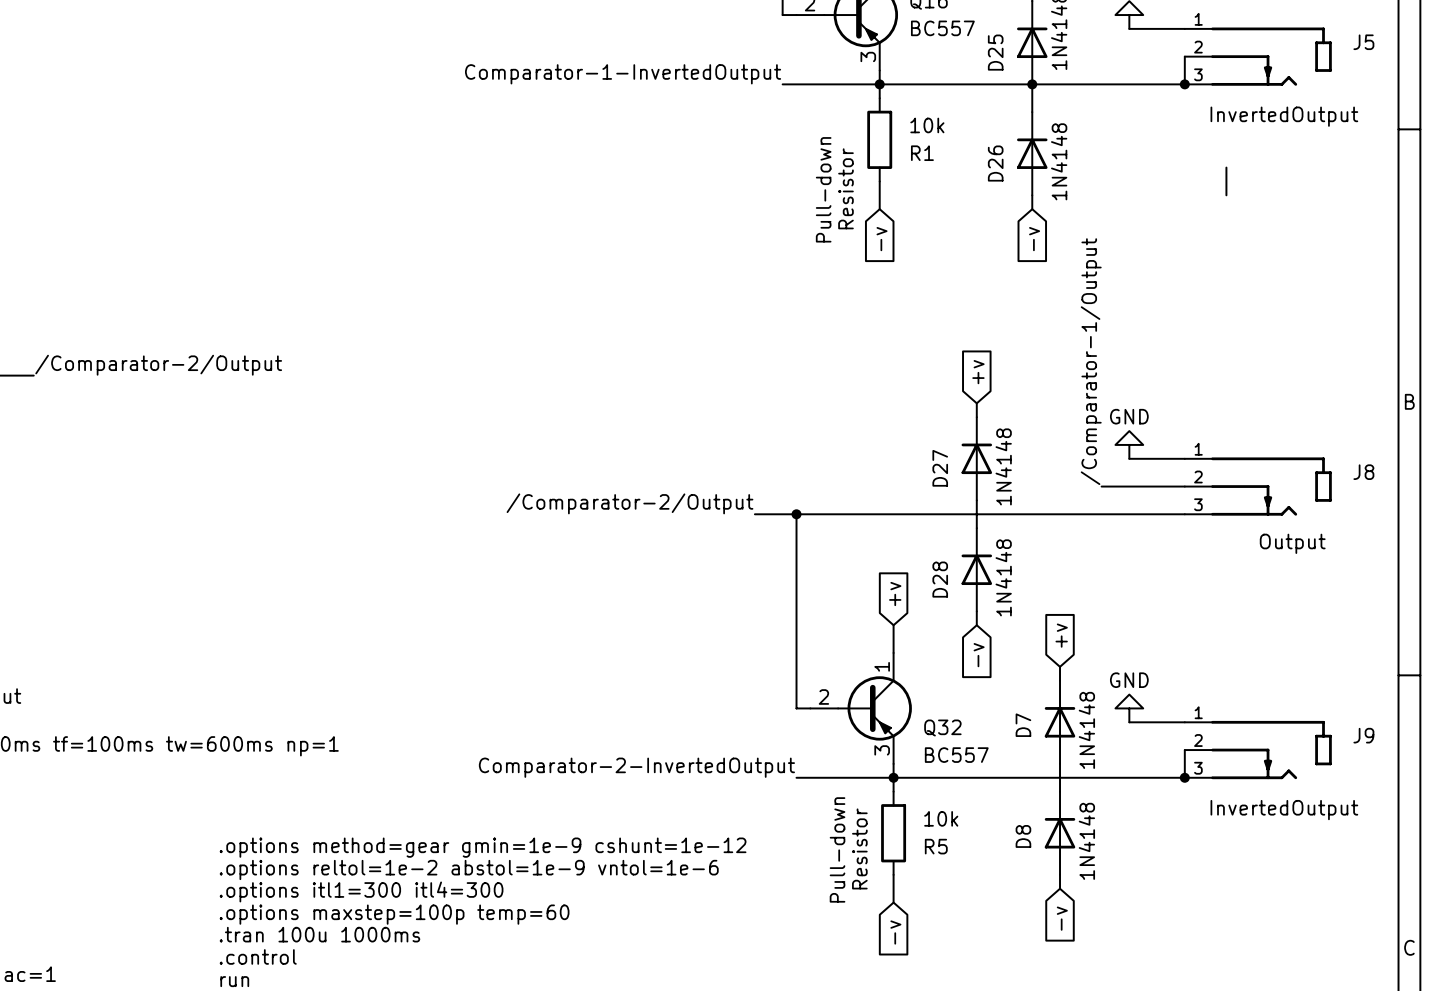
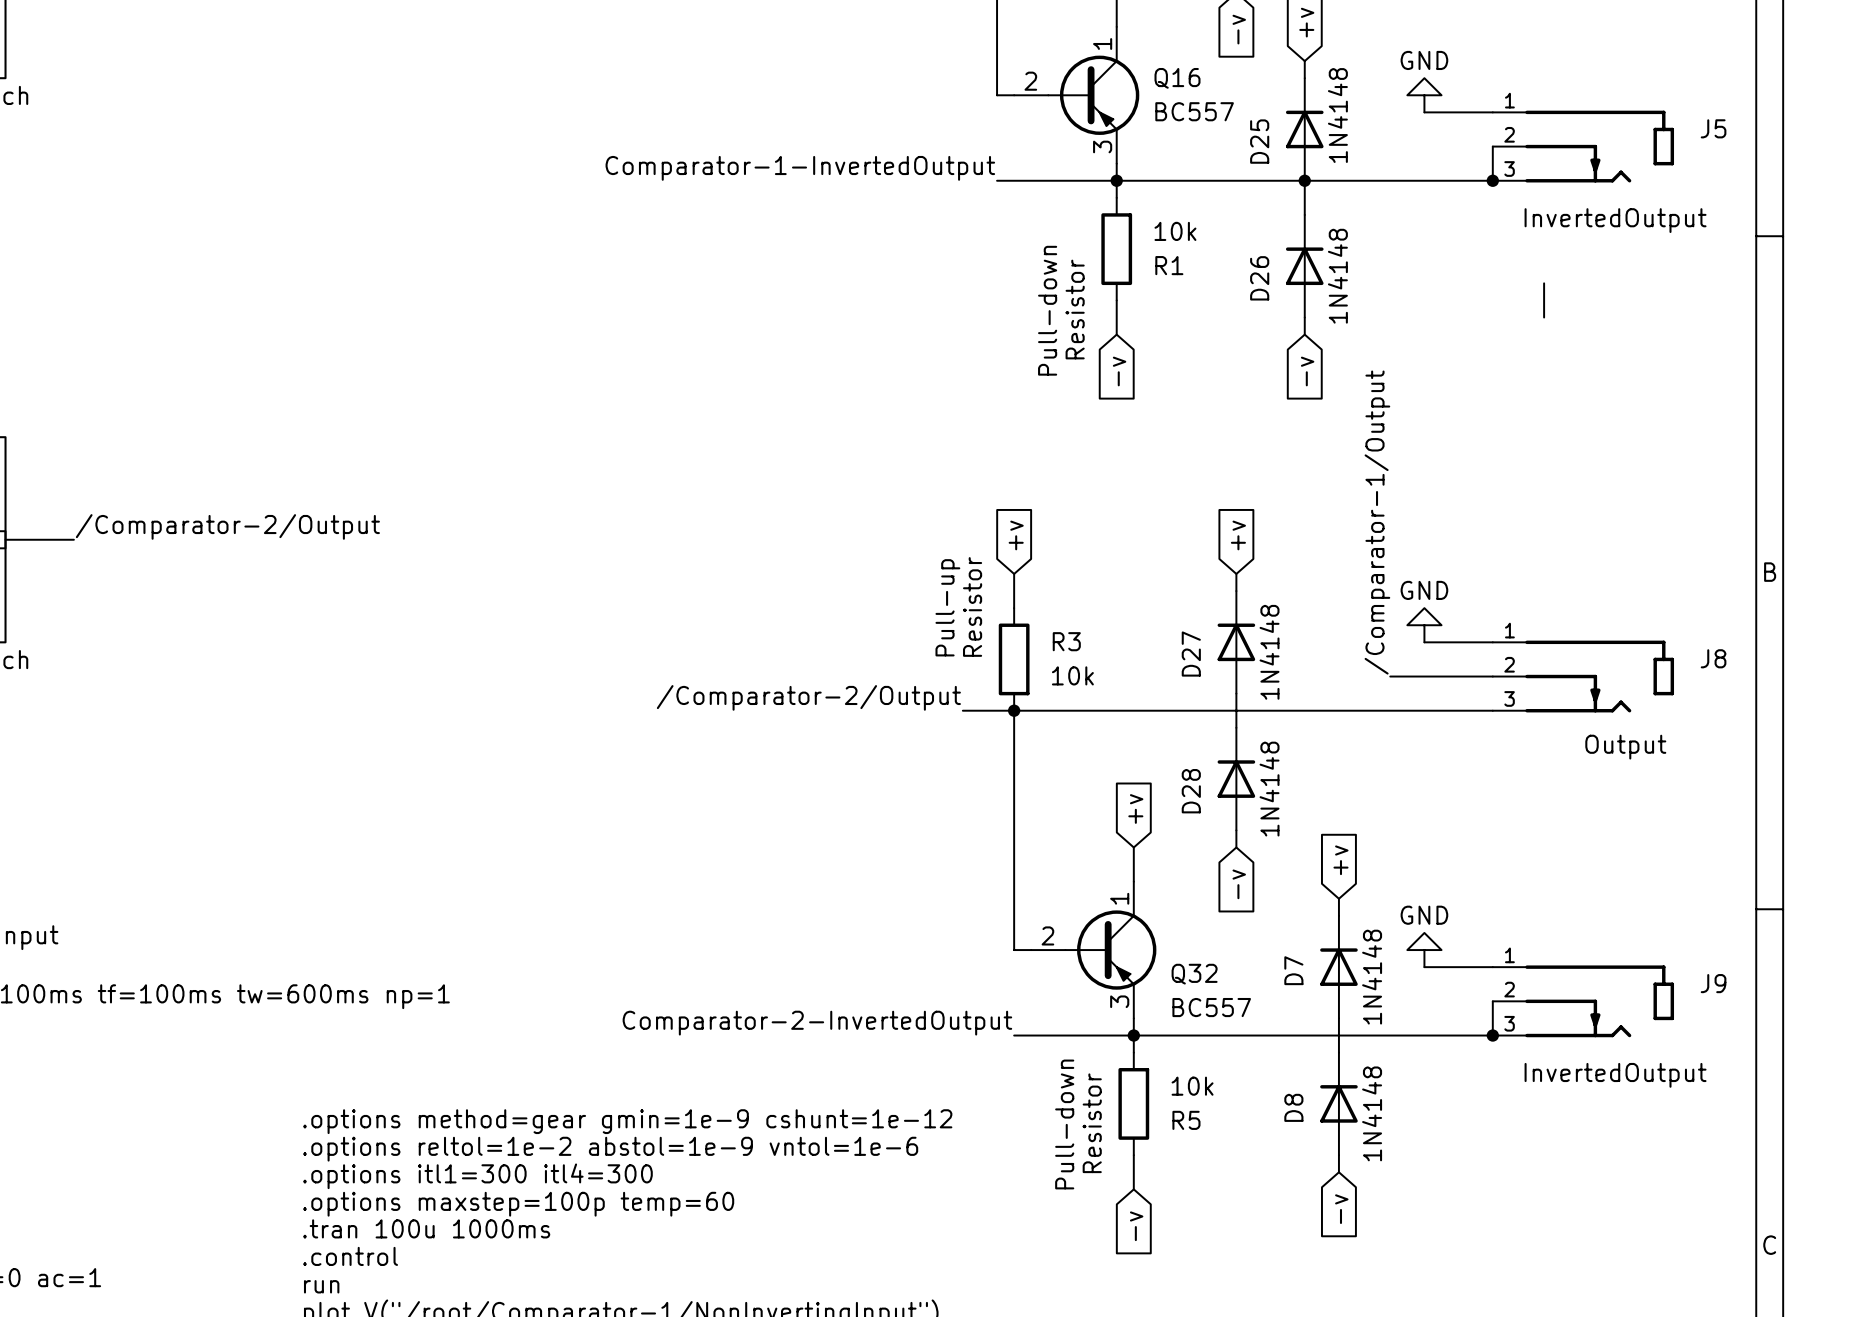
global label: none -> +v (1016, 535)
wire: none -> (1014, 573) (1014, 608)
text: none -> Pull-up (947, 607)
text: none -> Resistor (972, 606)
R3: none -> 10k (1014, 659)

